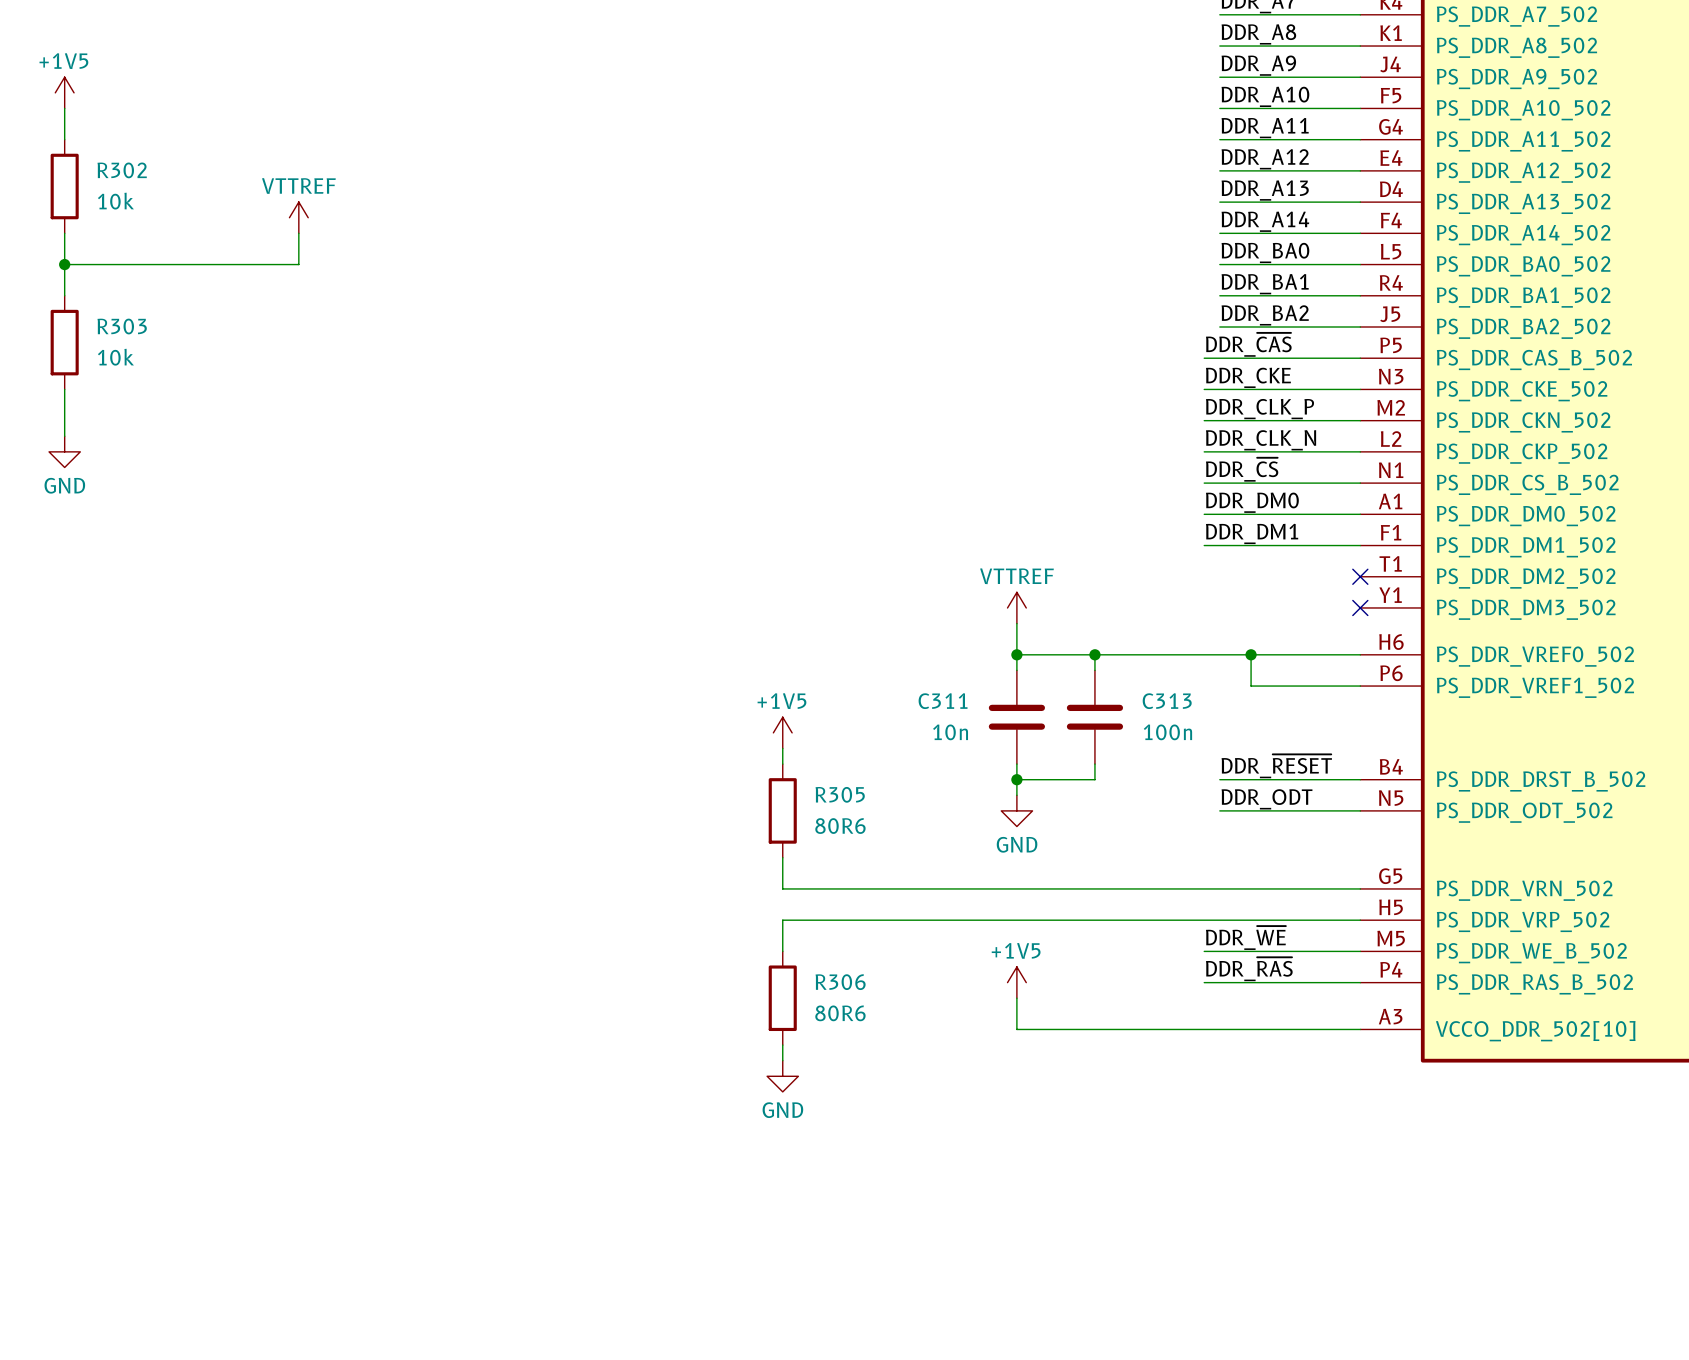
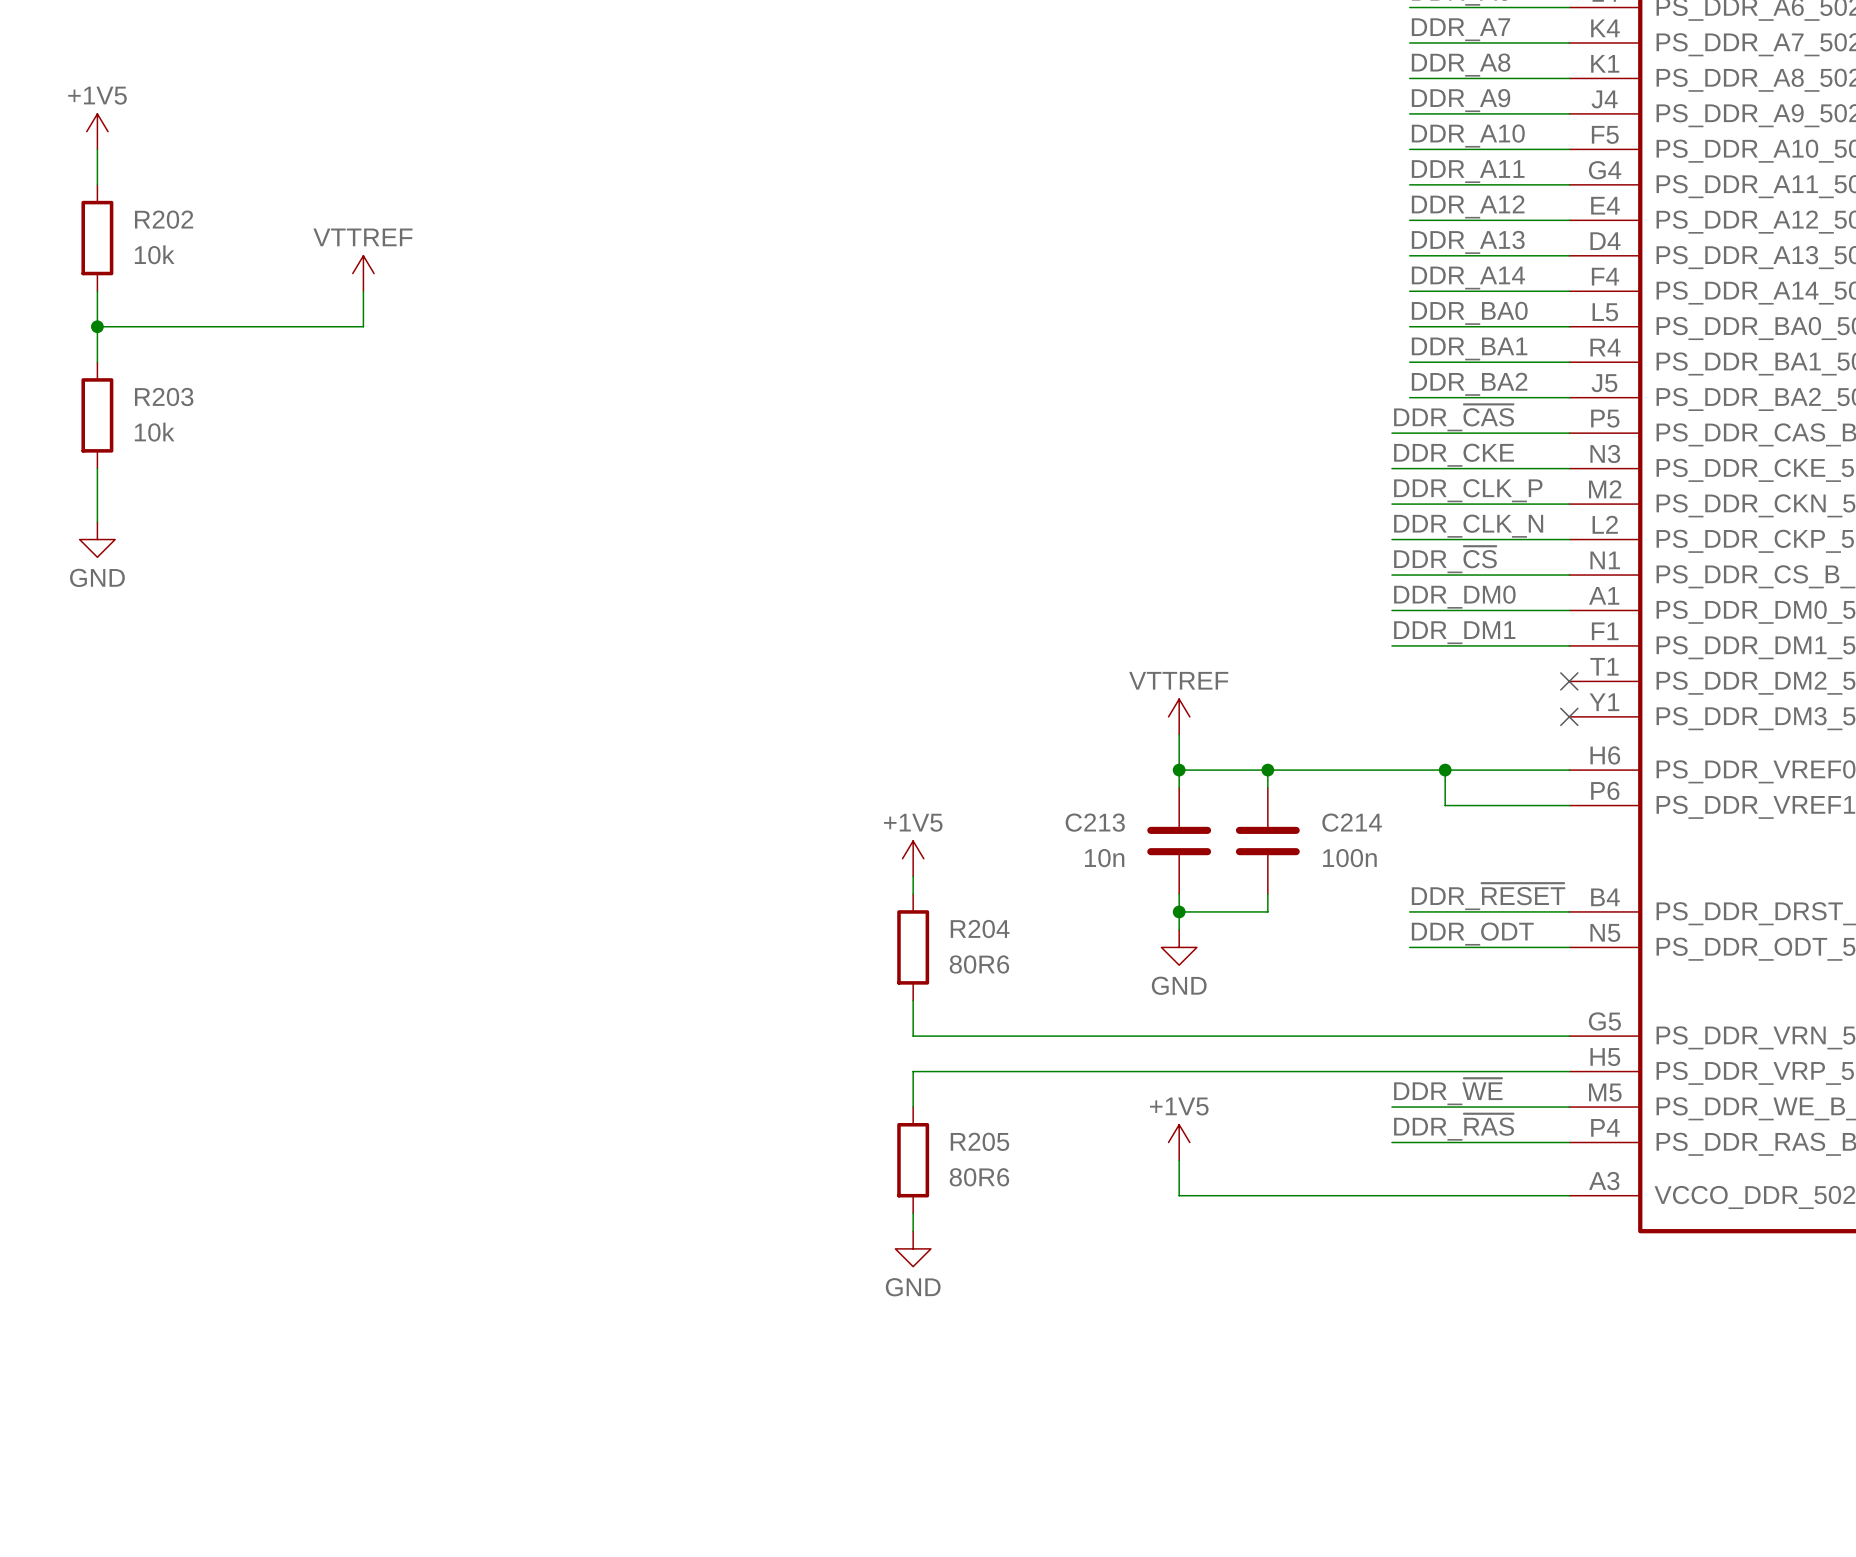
R302 name: R302 (122, 170) -> R202 (164, 219)
R303 name: R303 (122, 326) -> R203 (164, 397)
C311 name: C311 (943, 701) -> C213 (1095, 822)
C313 name: C313 (1167, 701) -> C214 (1352, 822)
R305 name: R305 (840, 794) -> R204 (980, 929)
R306 name: R306 (840, 982) -> R205 (979, 1141)

